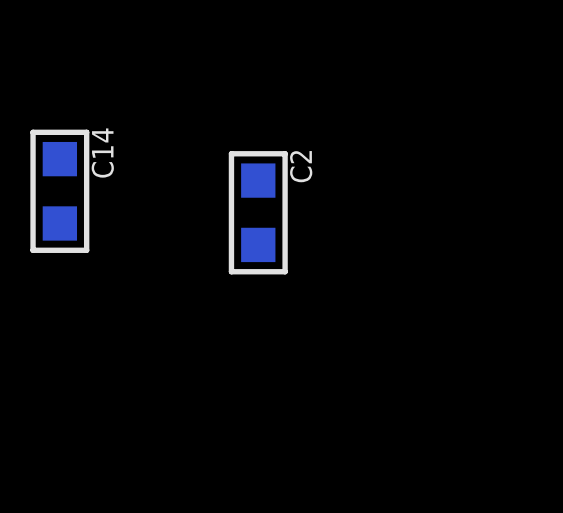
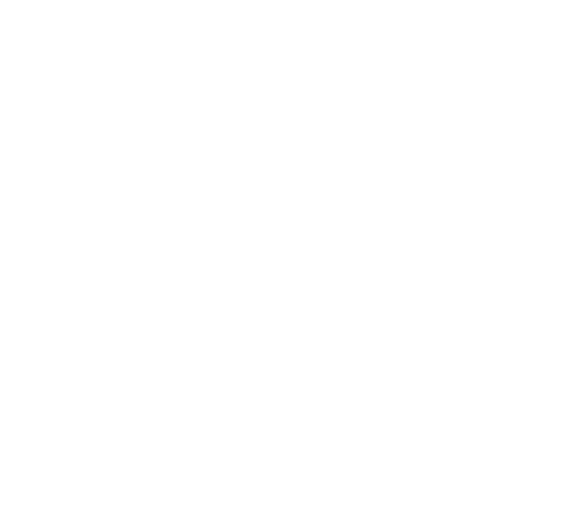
C14: (59, 191) -> none
C2: (258, 212) -> none

